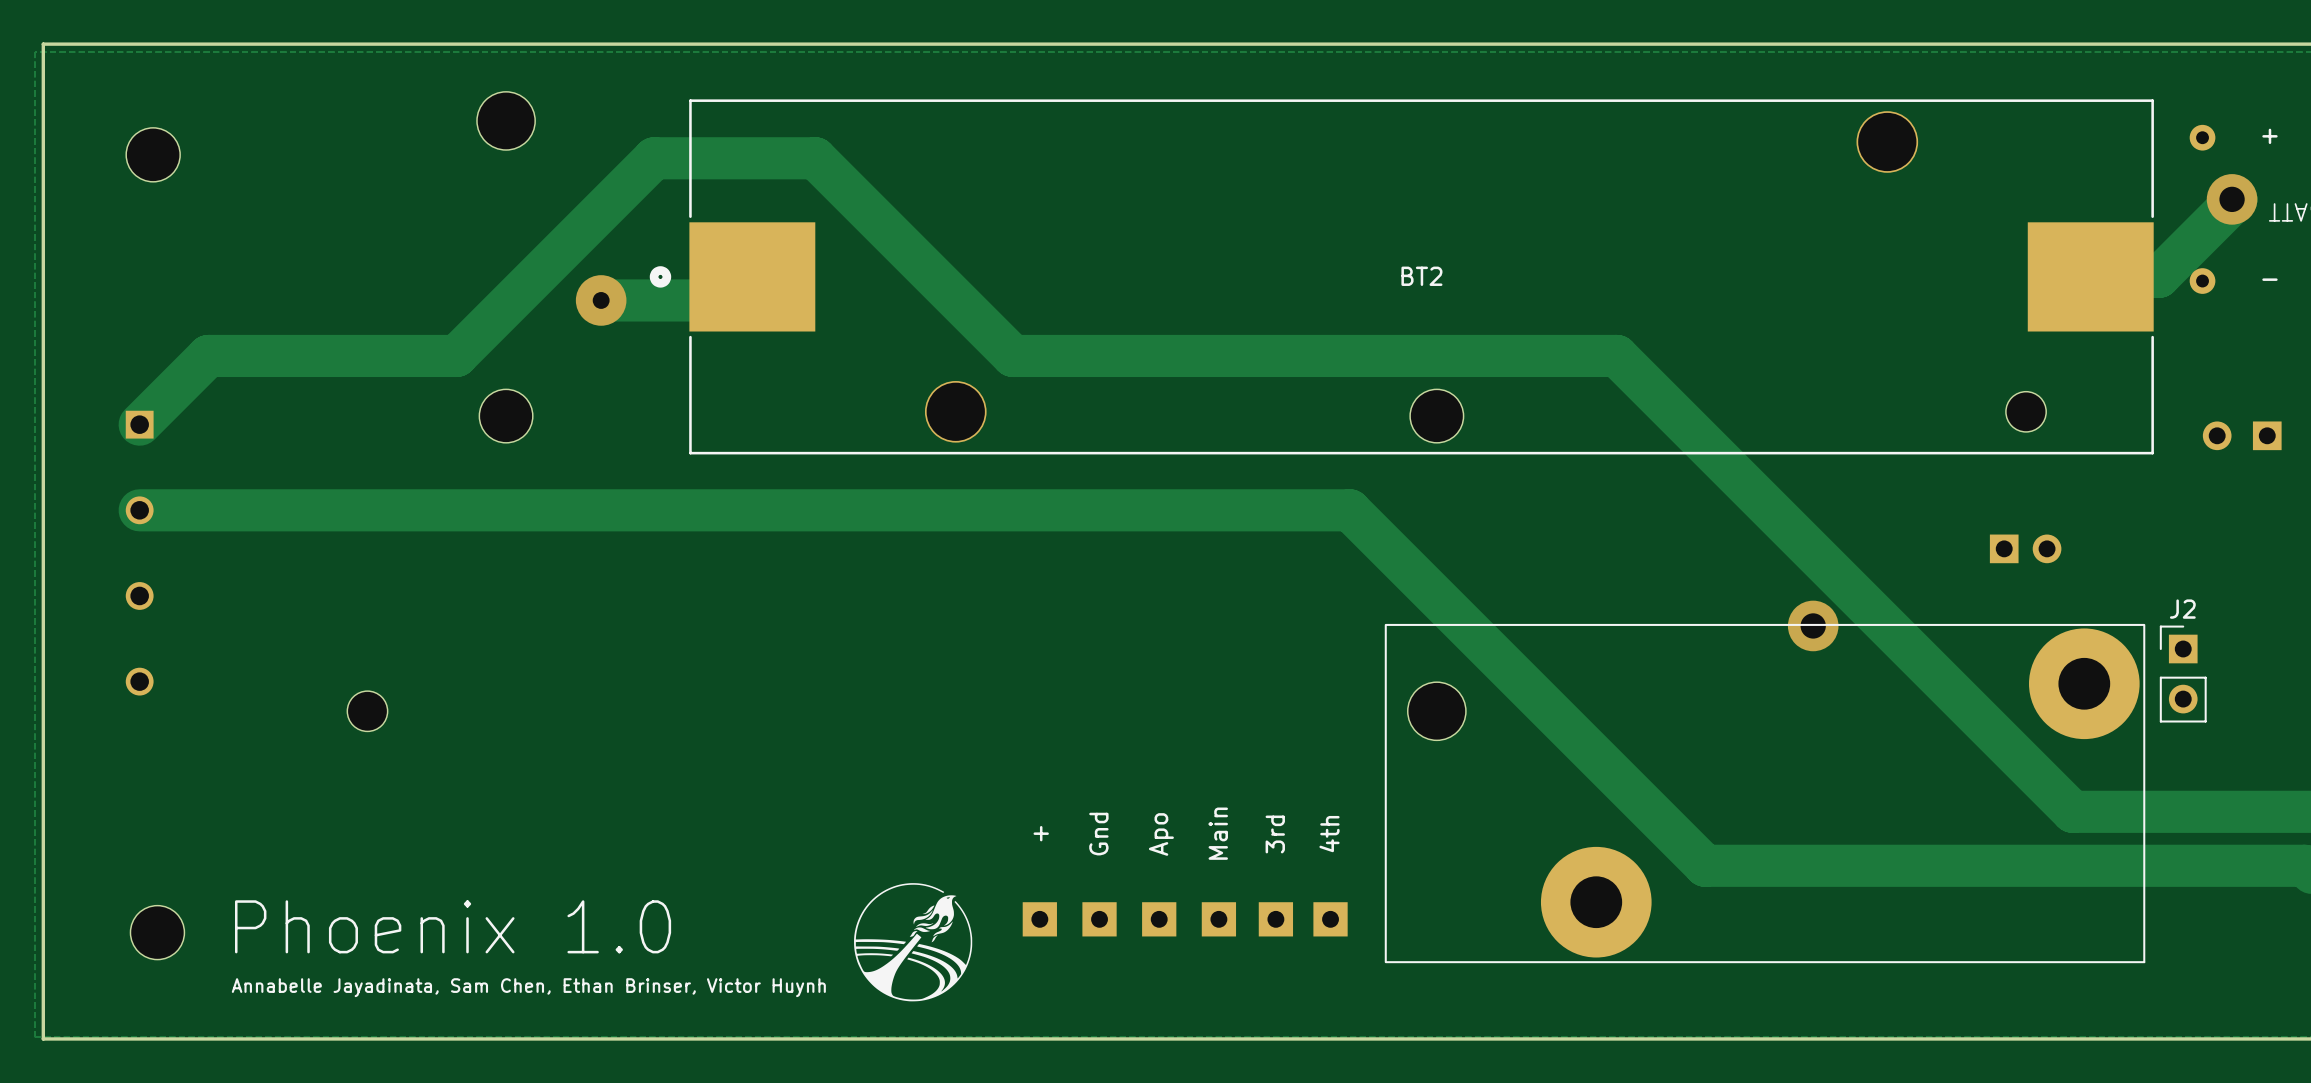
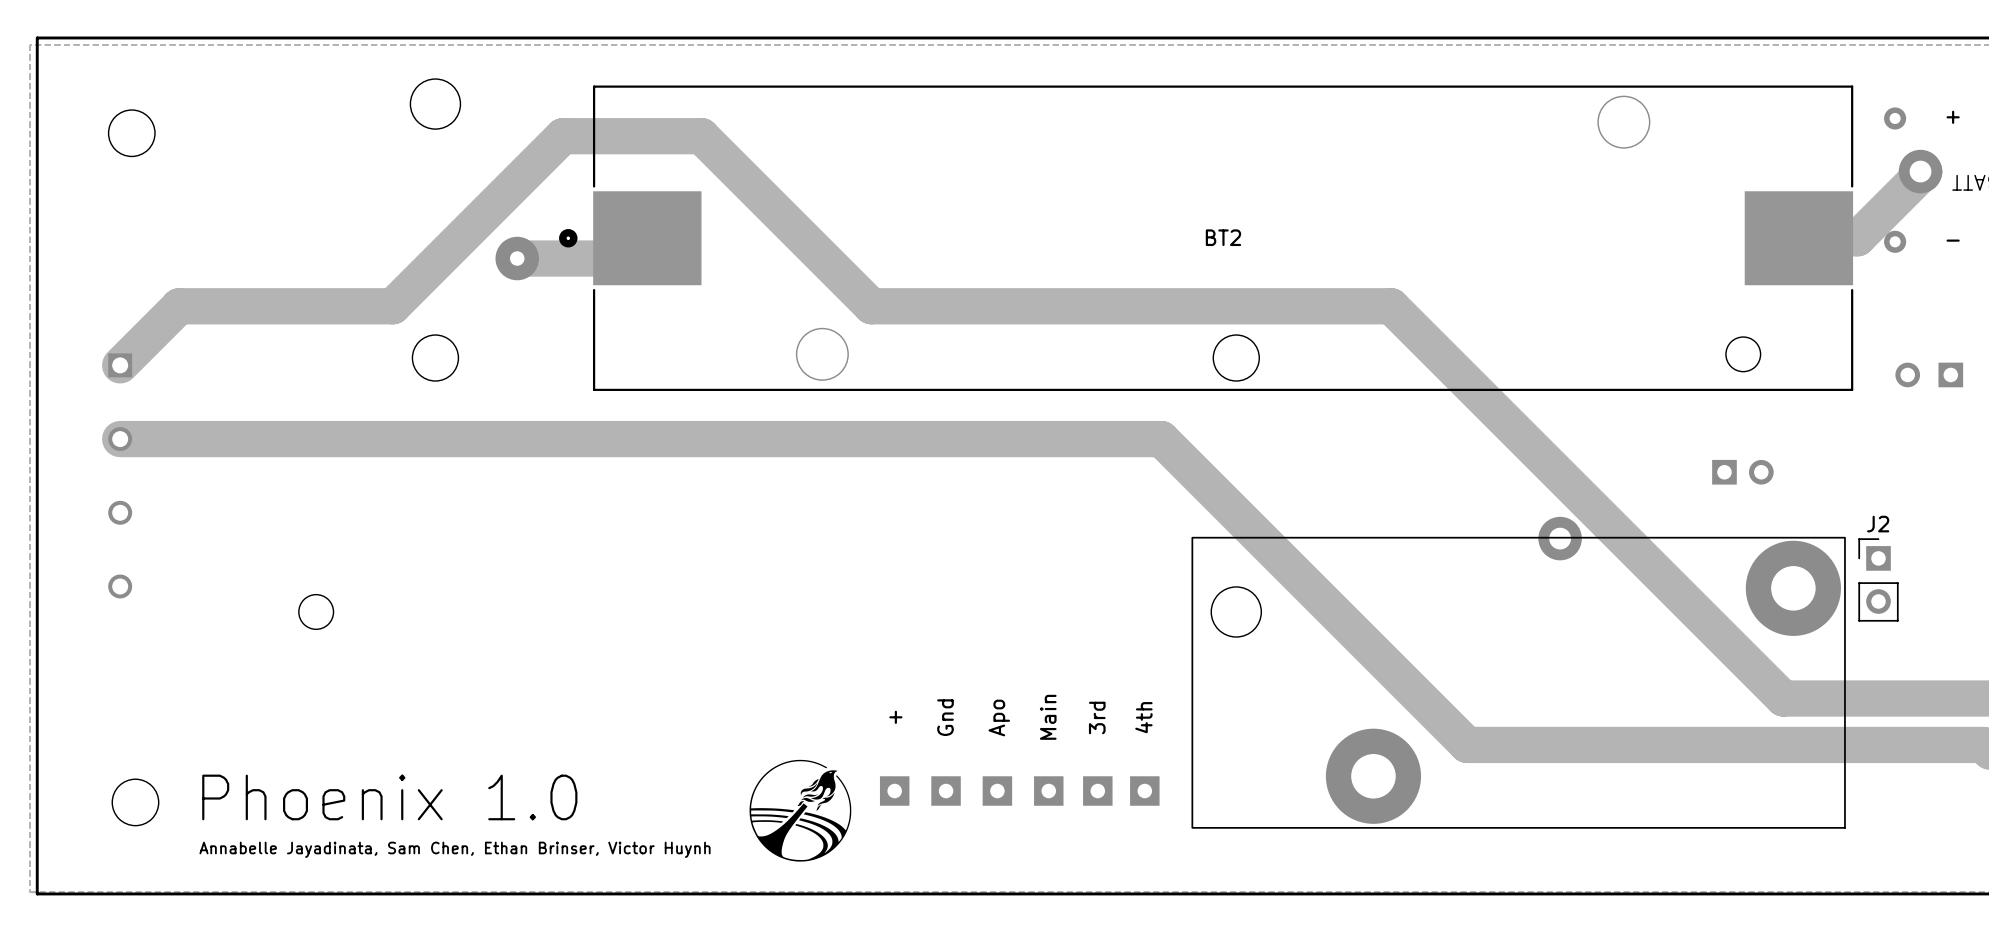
drawing position: (913, 942) -> (800, 810)

